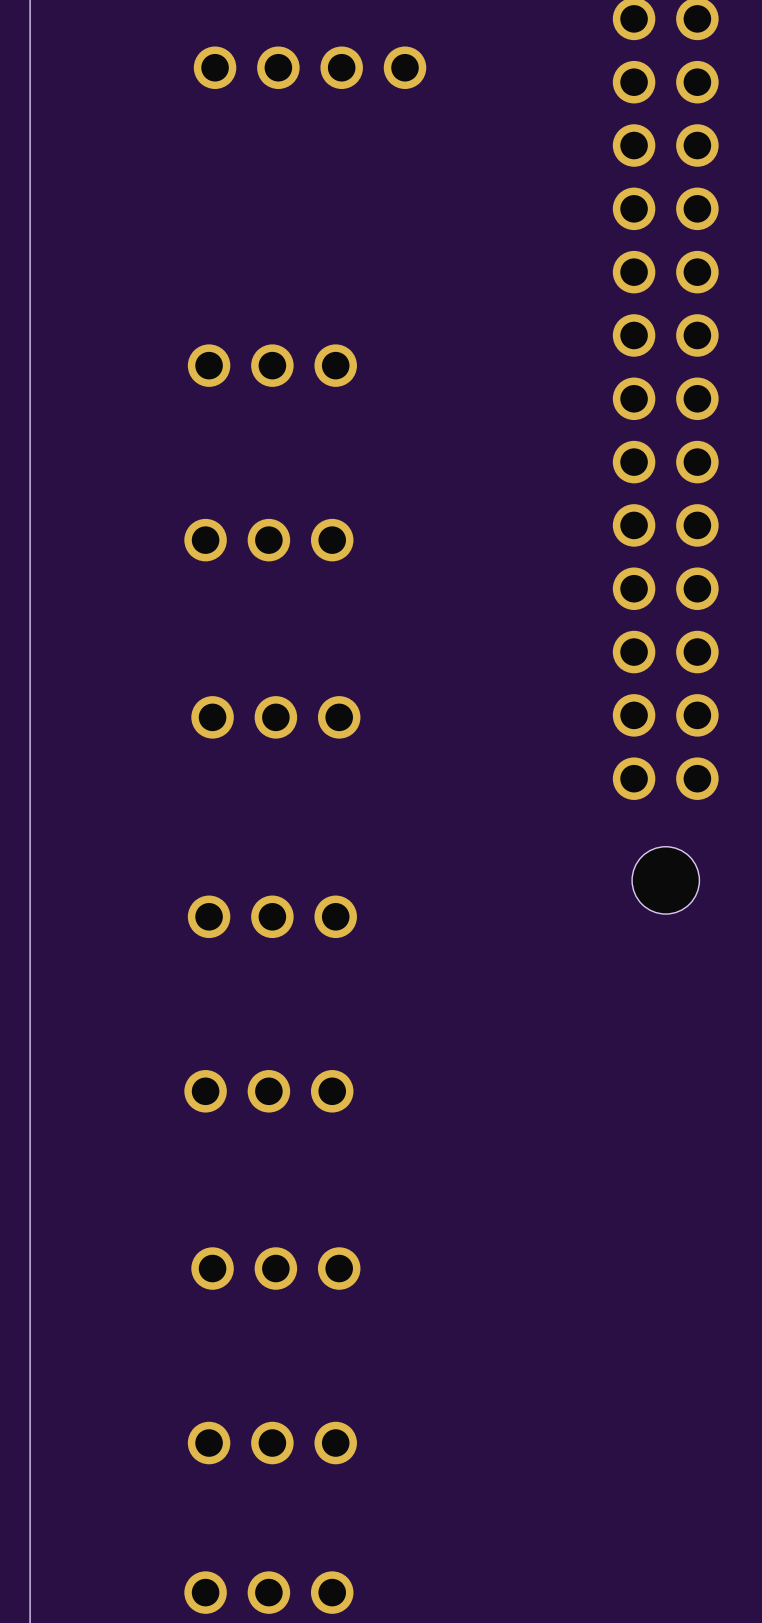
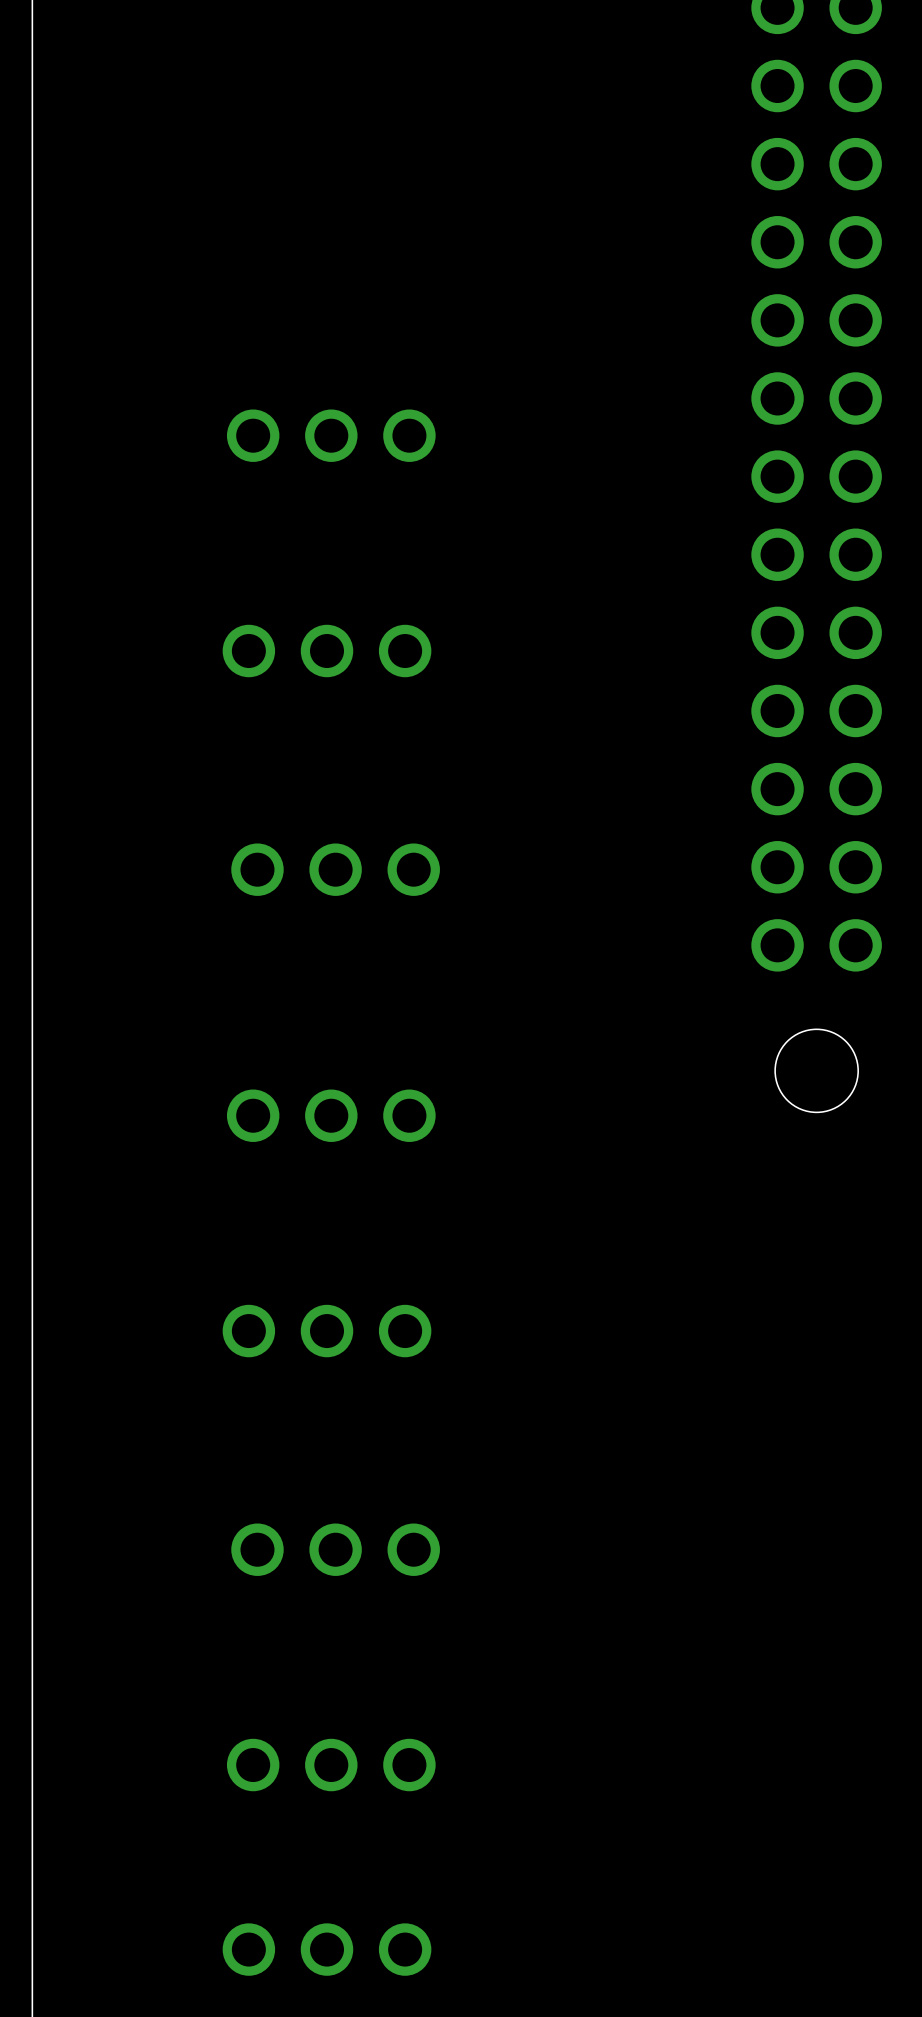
part: (310, 67) -> none

